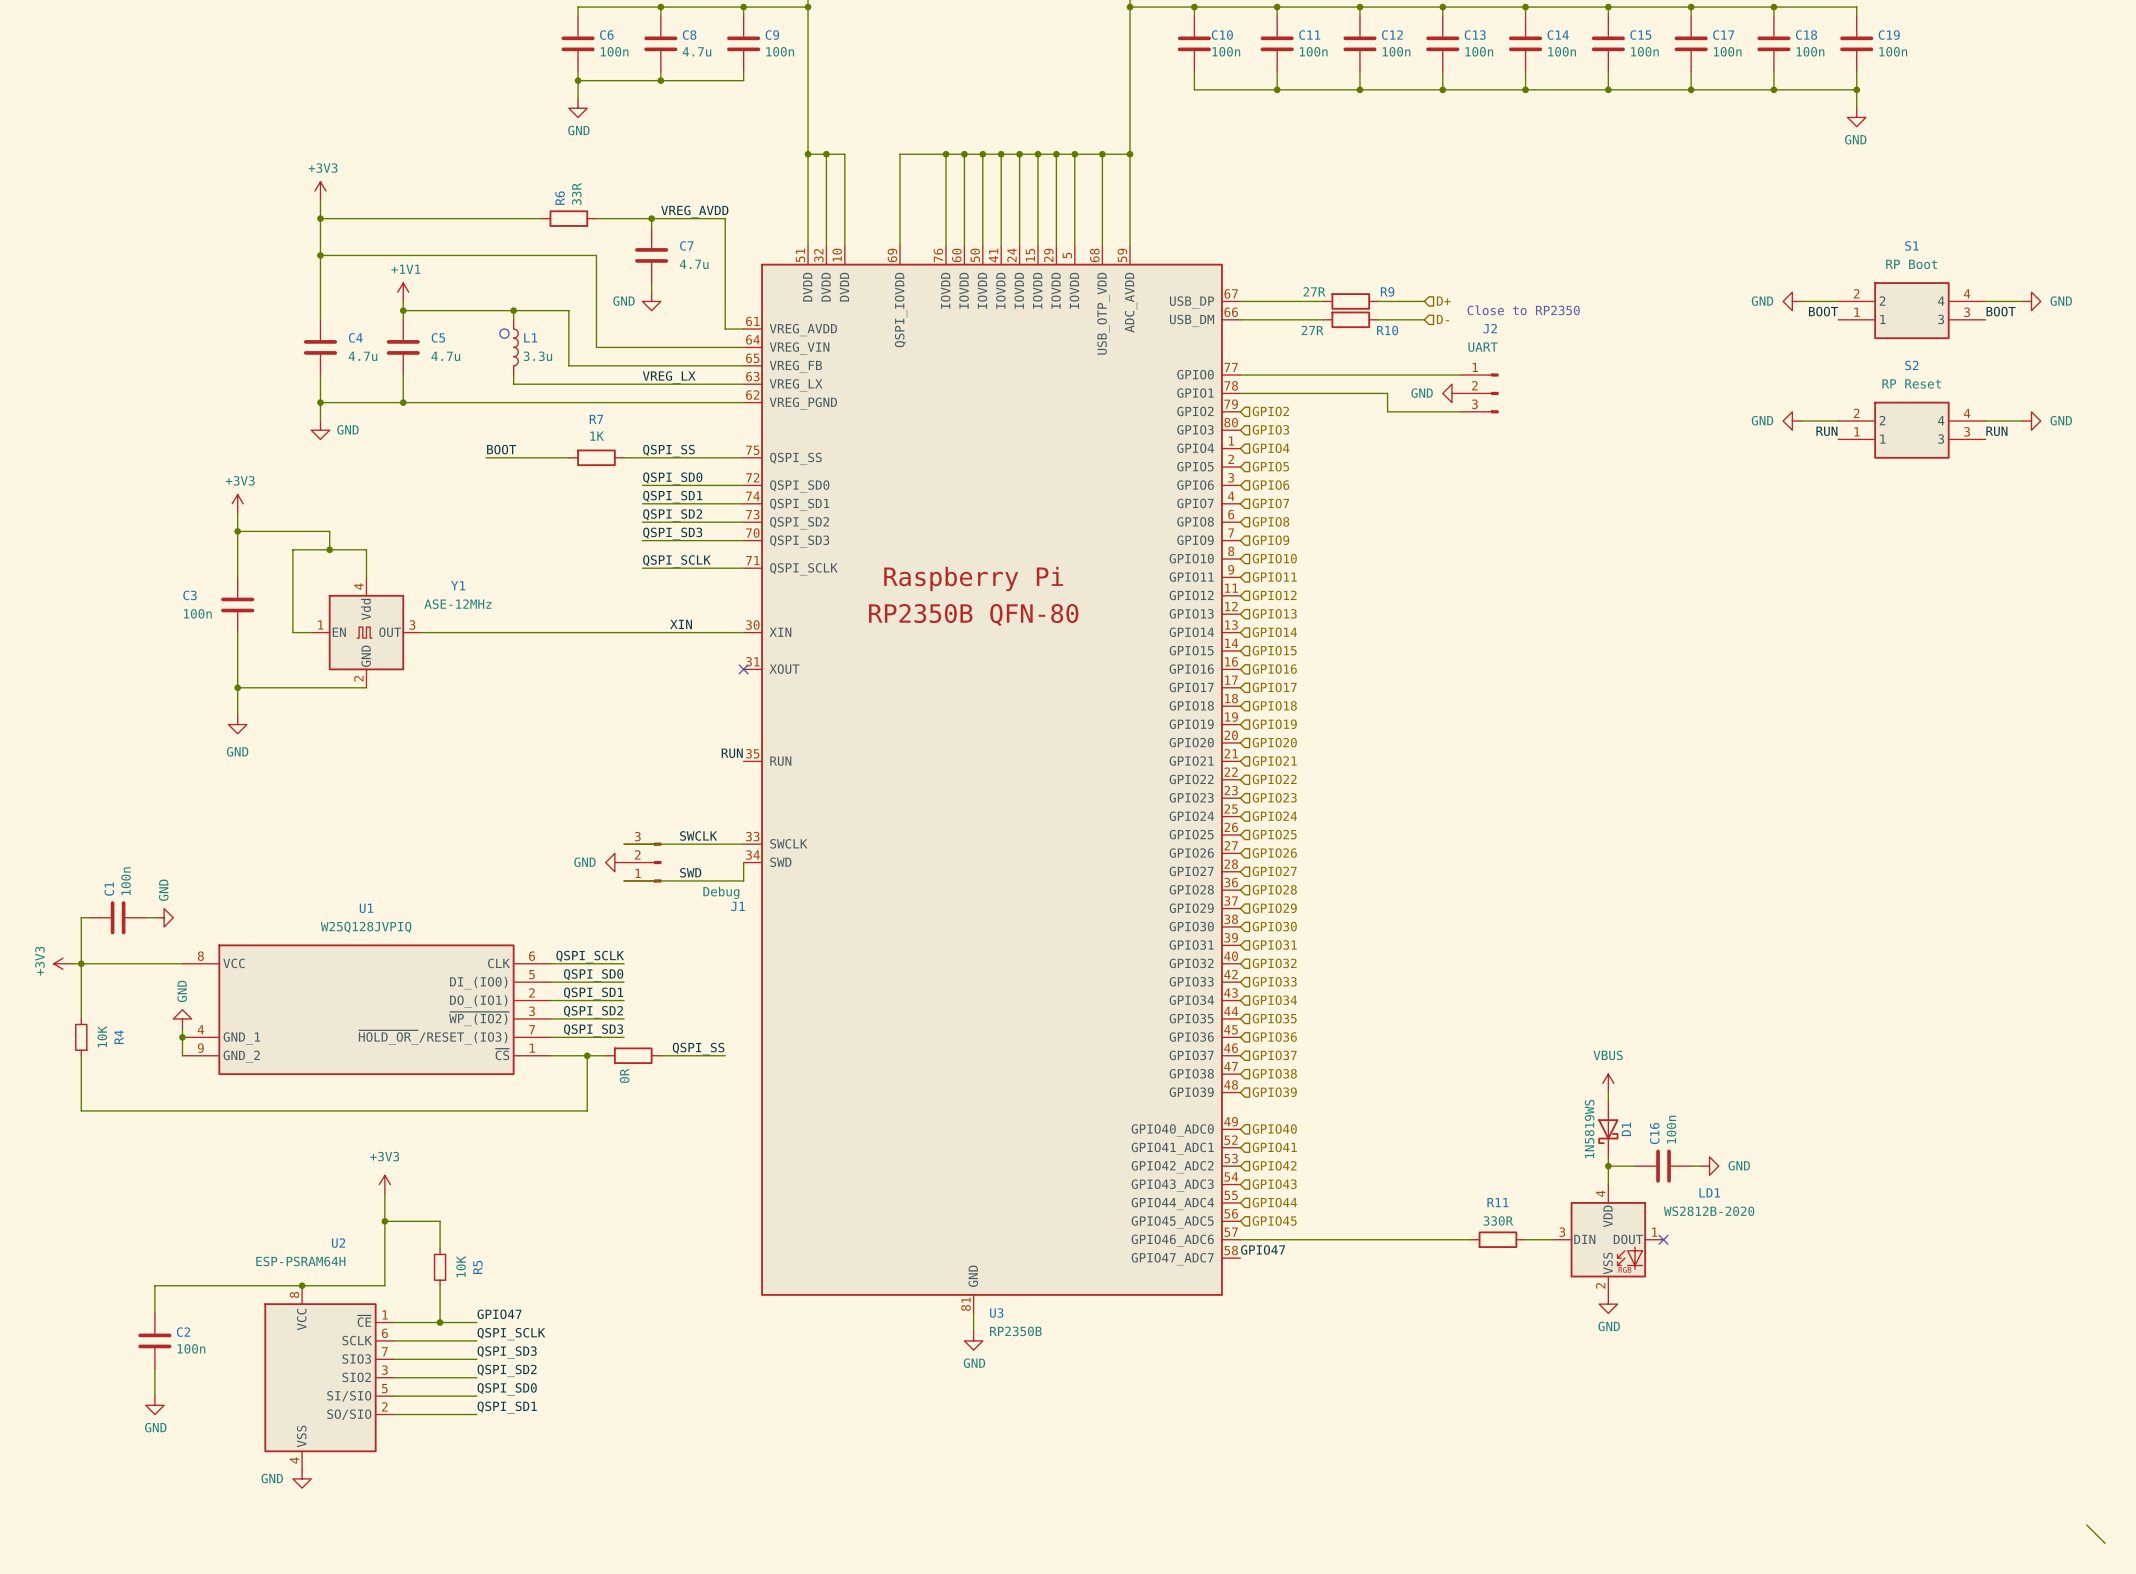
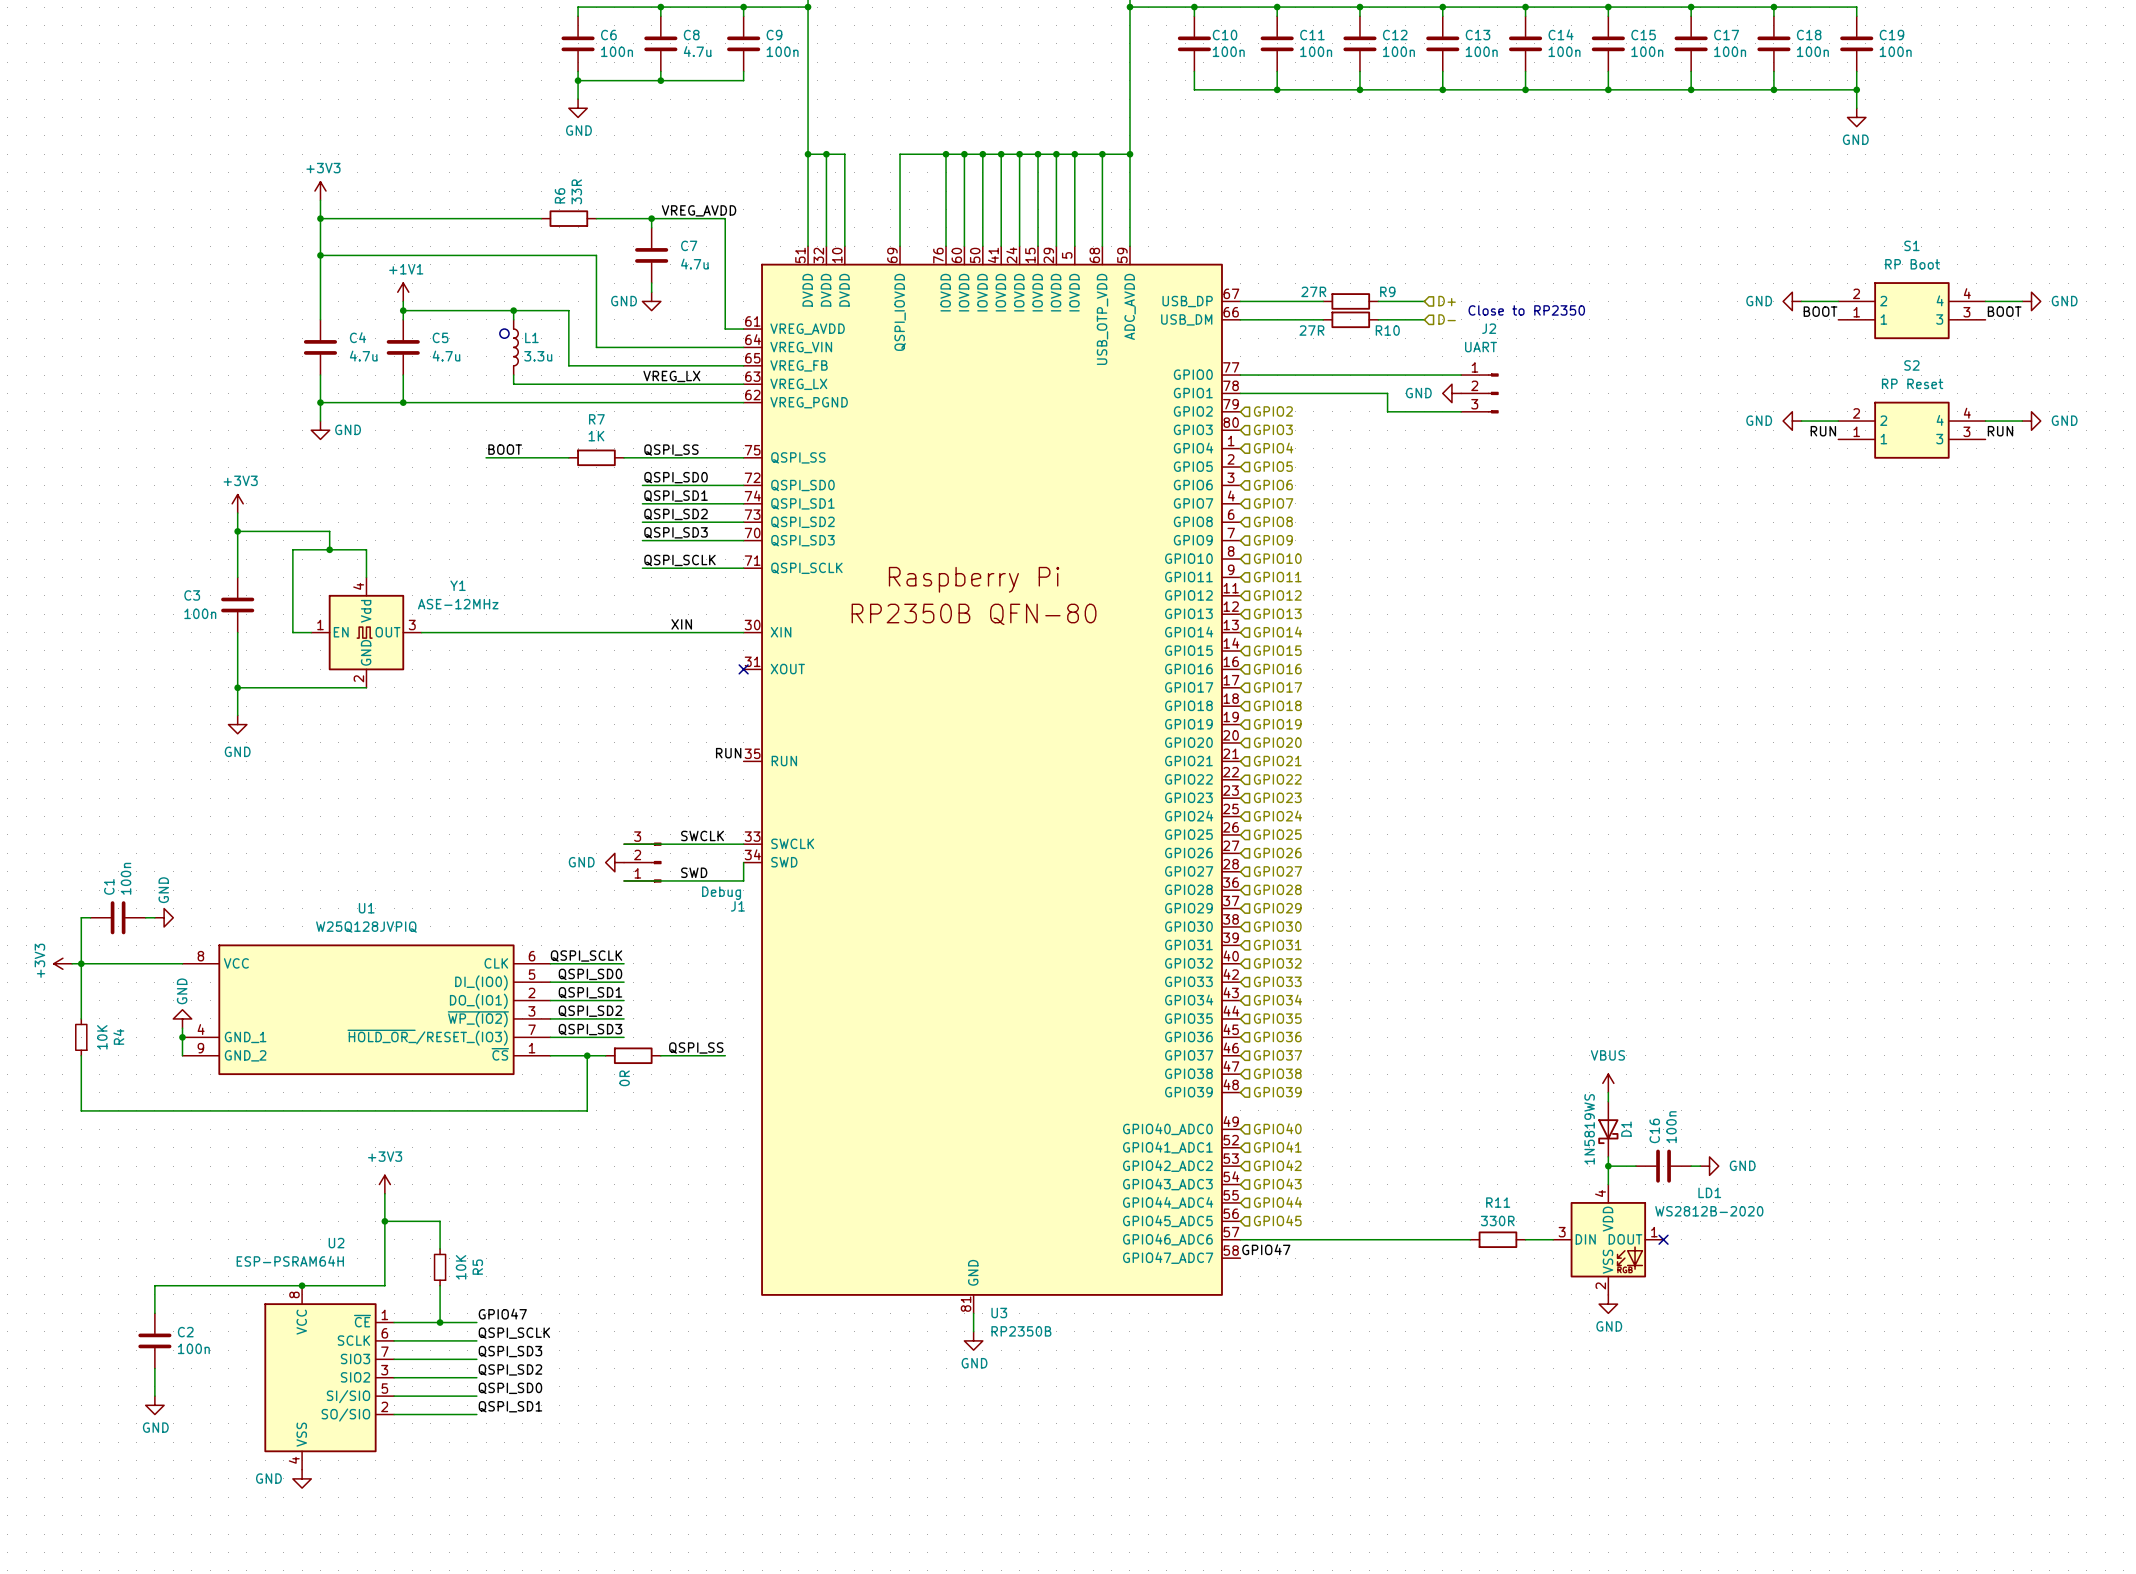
wire: (2086, 1524) (2105, 1543) -> none

